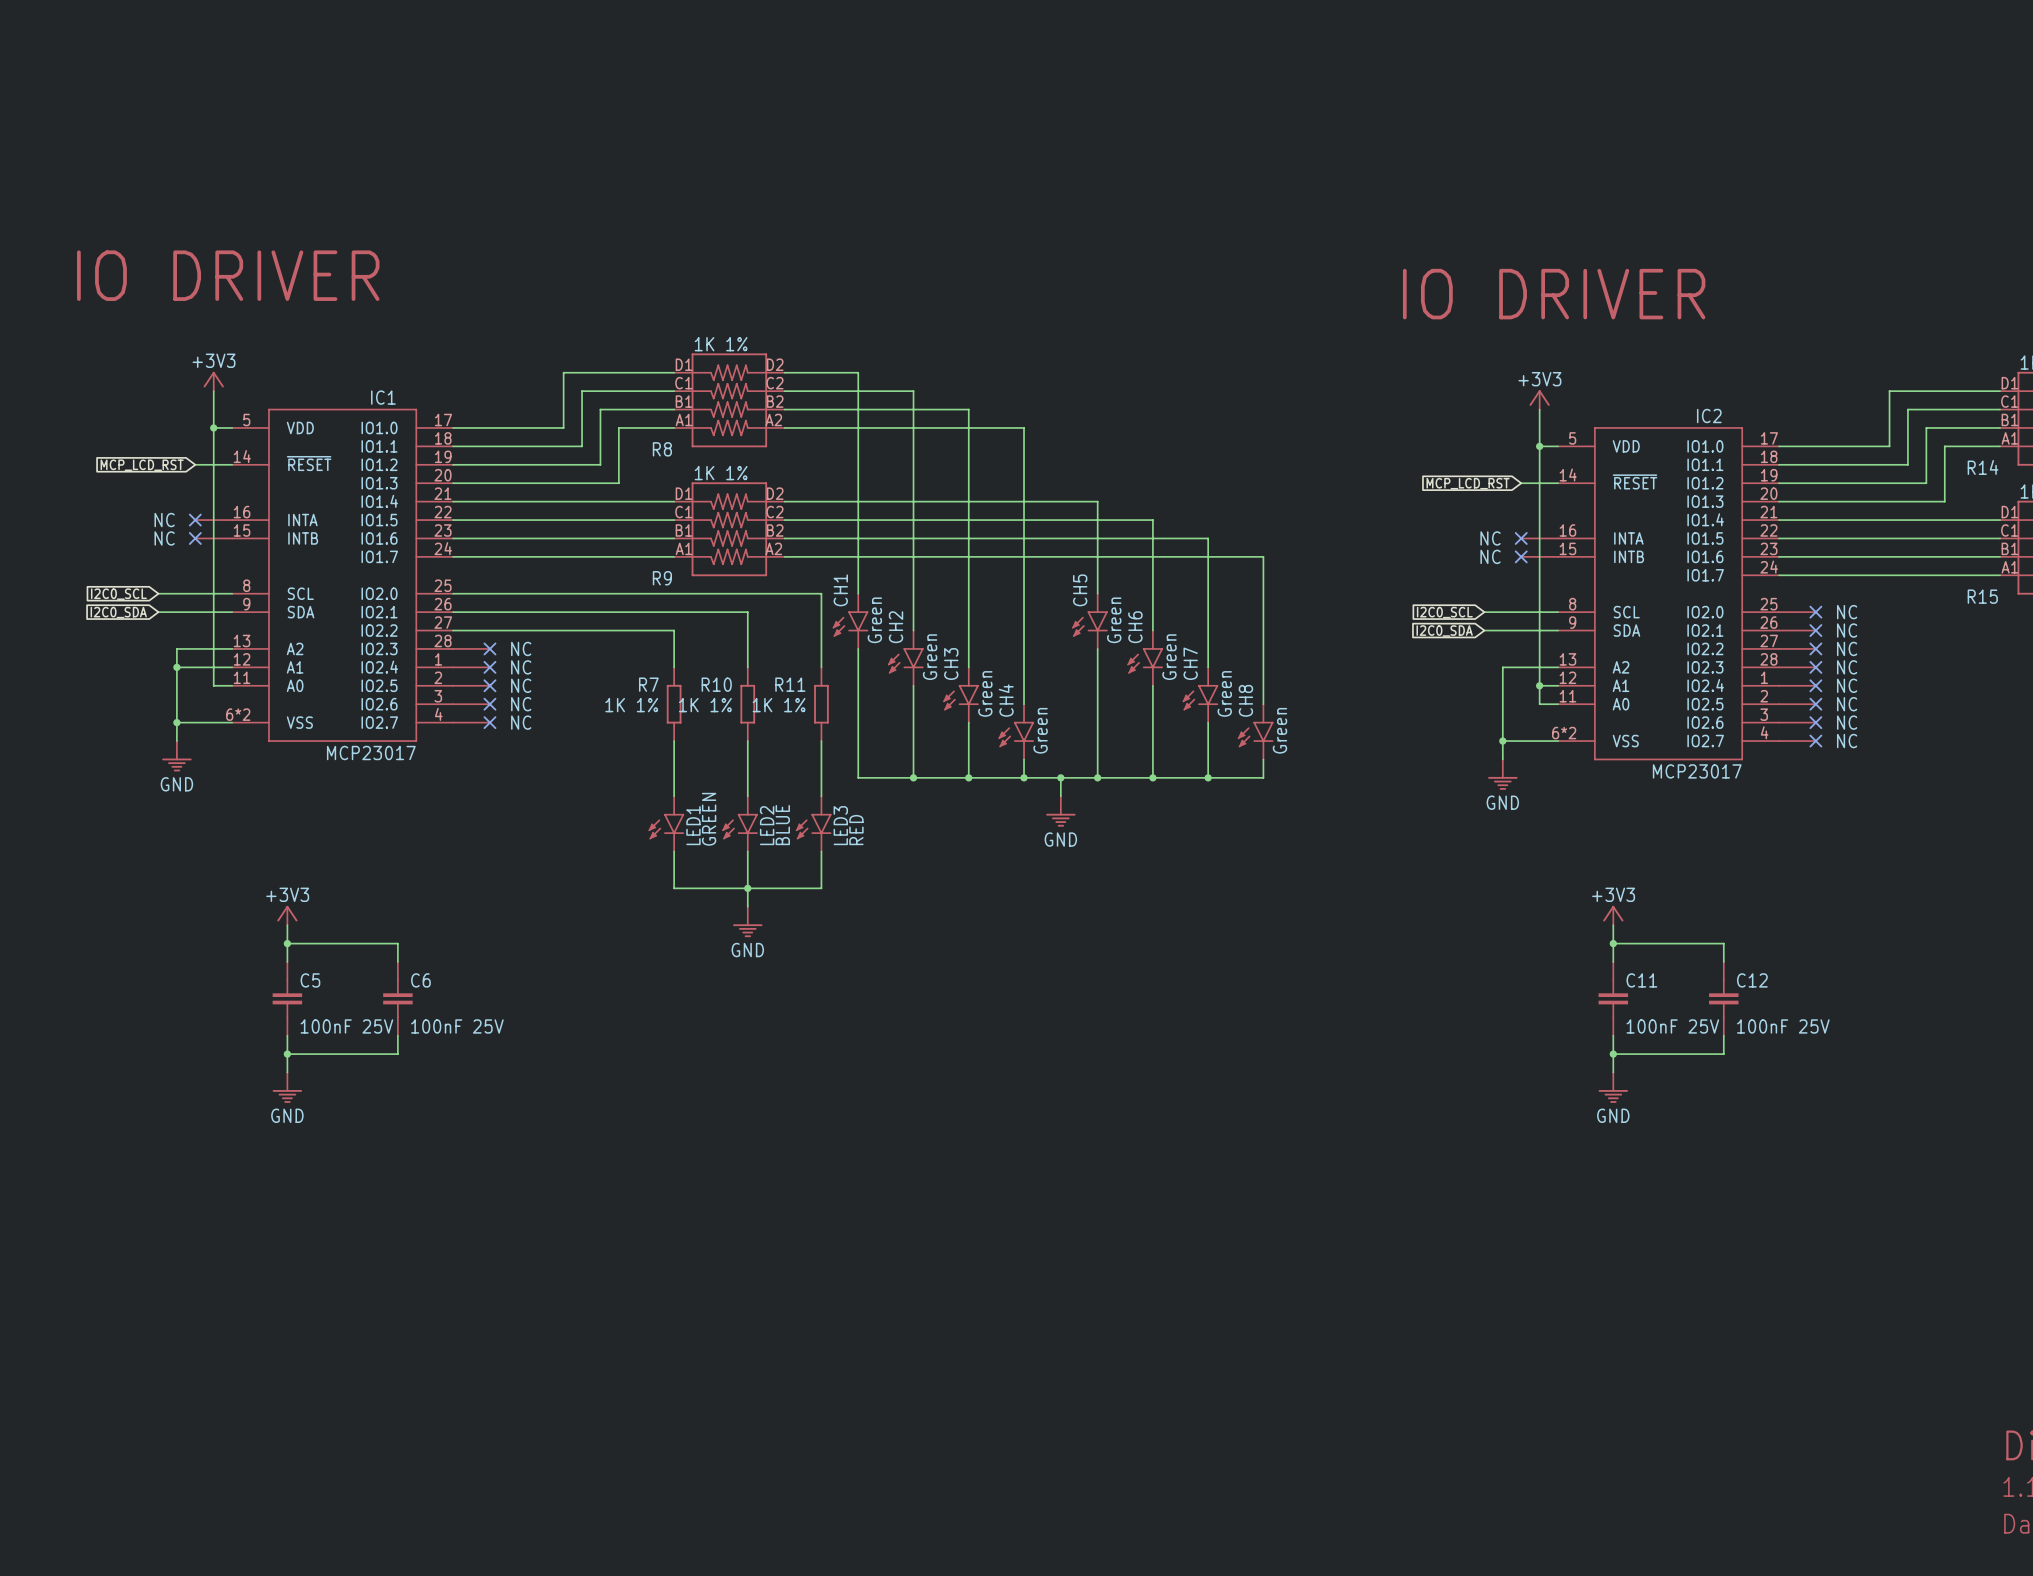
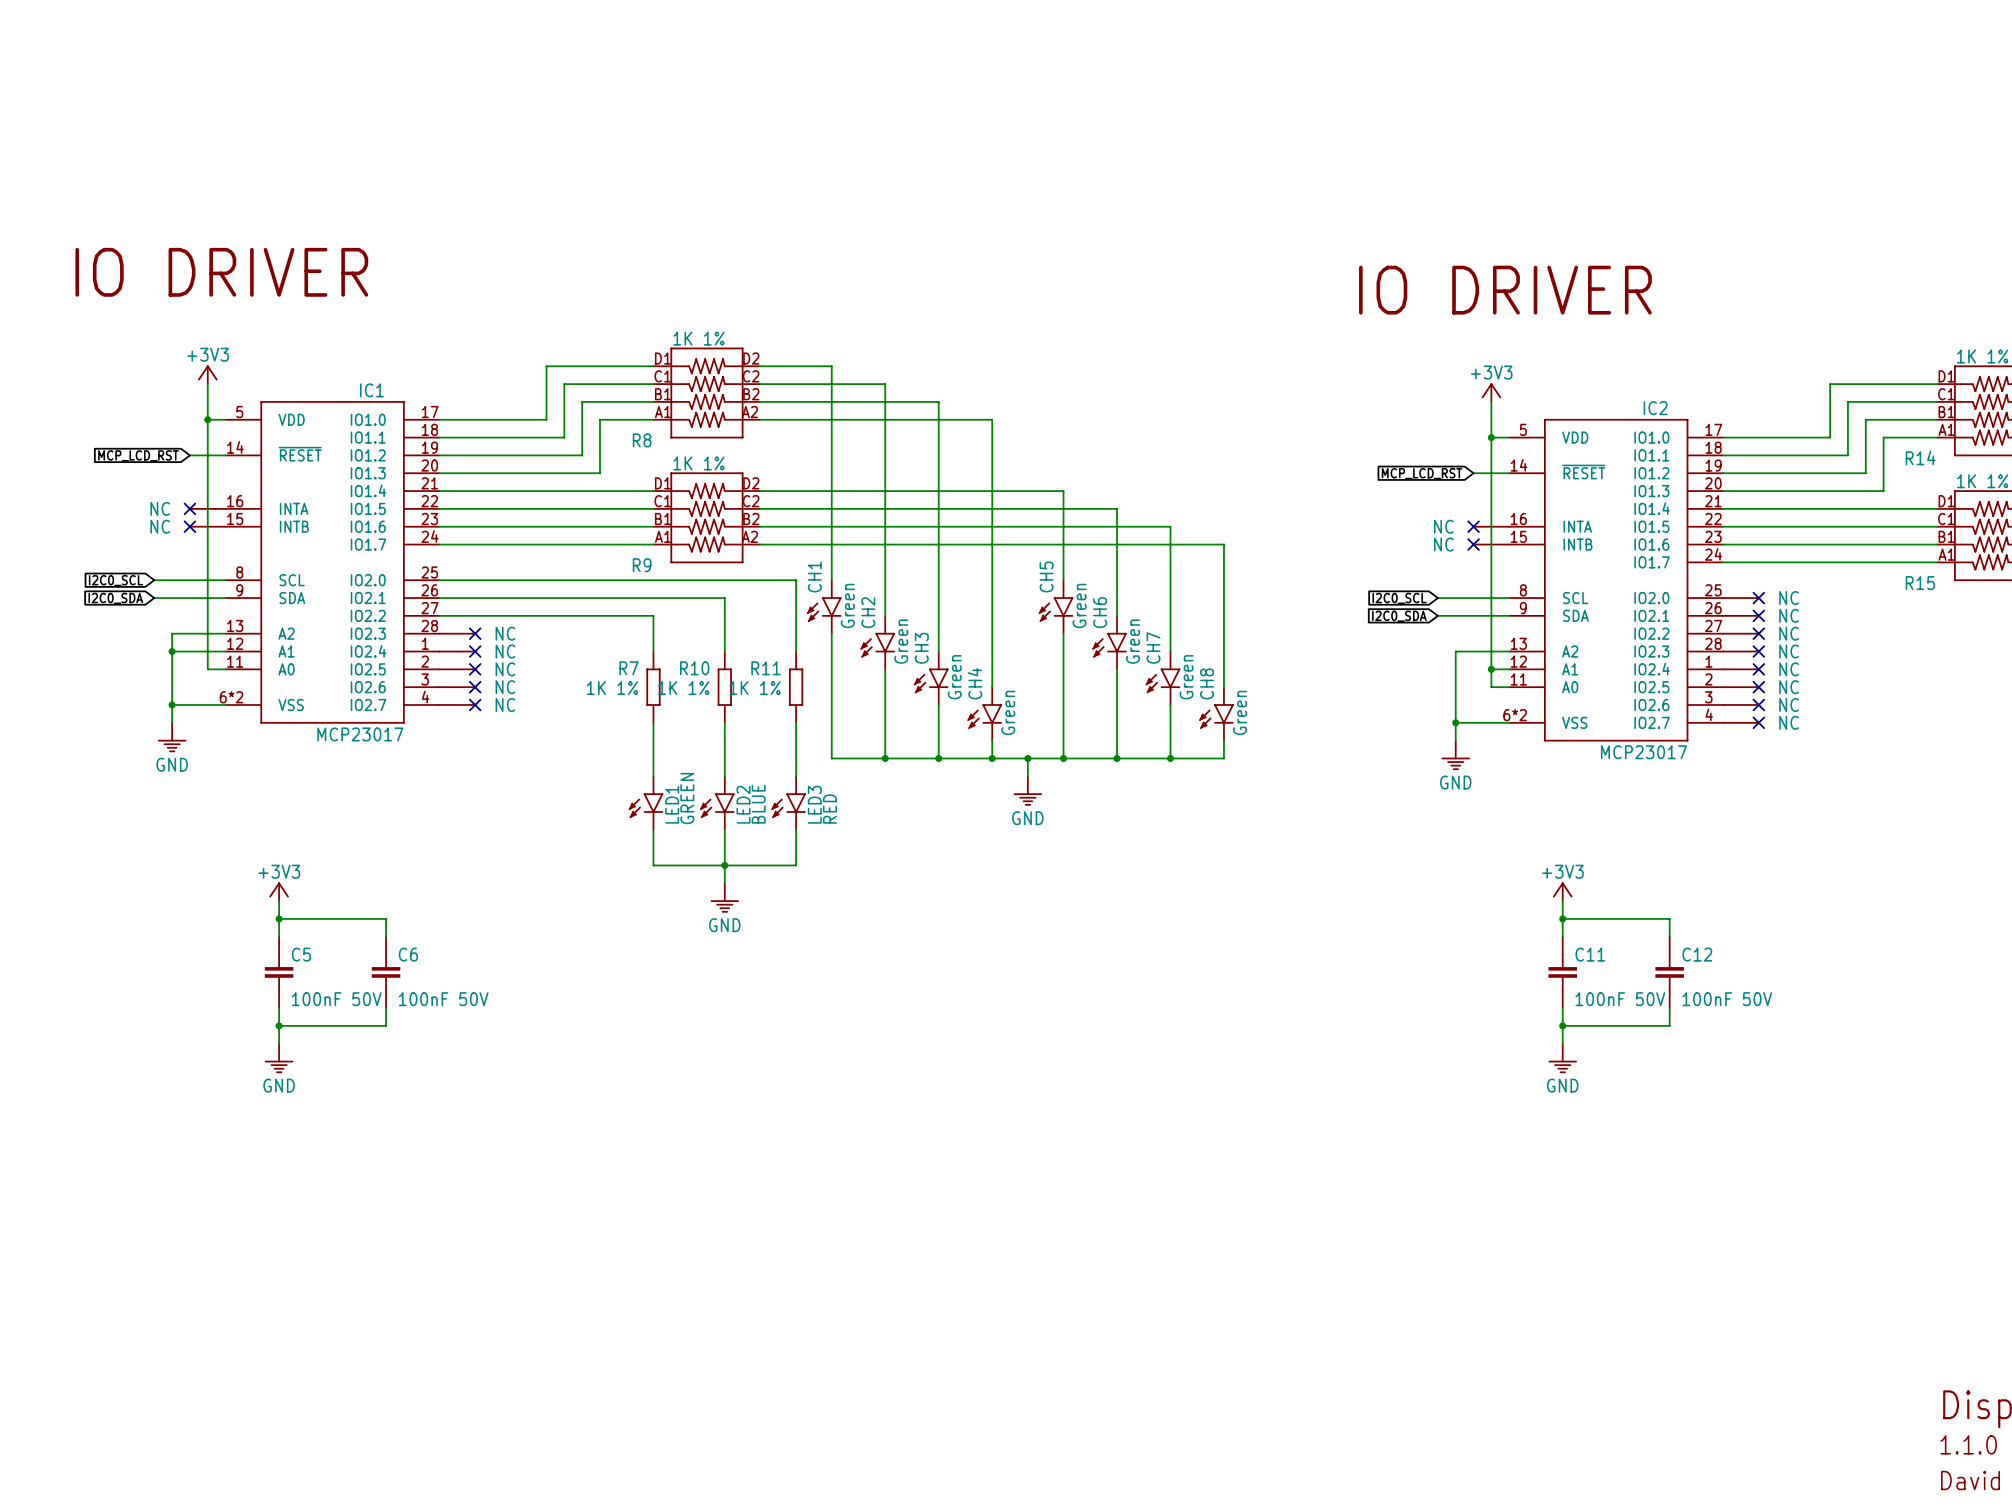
C5 value: 100nF 25V (346, 1026) -> 100nF 50V (336, 999)
C6 value: 100nF 25V (457, 1026) -> 100nF 50V (443, 999)
C11 value: 100nF 25V (1672, 1026) -> 100nF 50V (1620, 999)
C12 value: 100nF 25V (1783, 1026) -> 100nF 50V (1727, 999)

